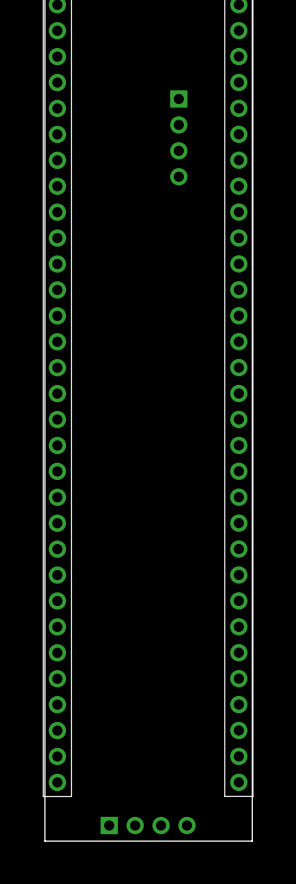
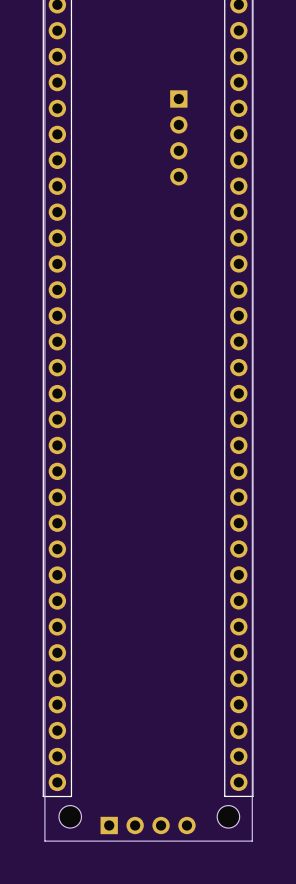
part: none -> (70, 816)
part: none -> (228, 816)

